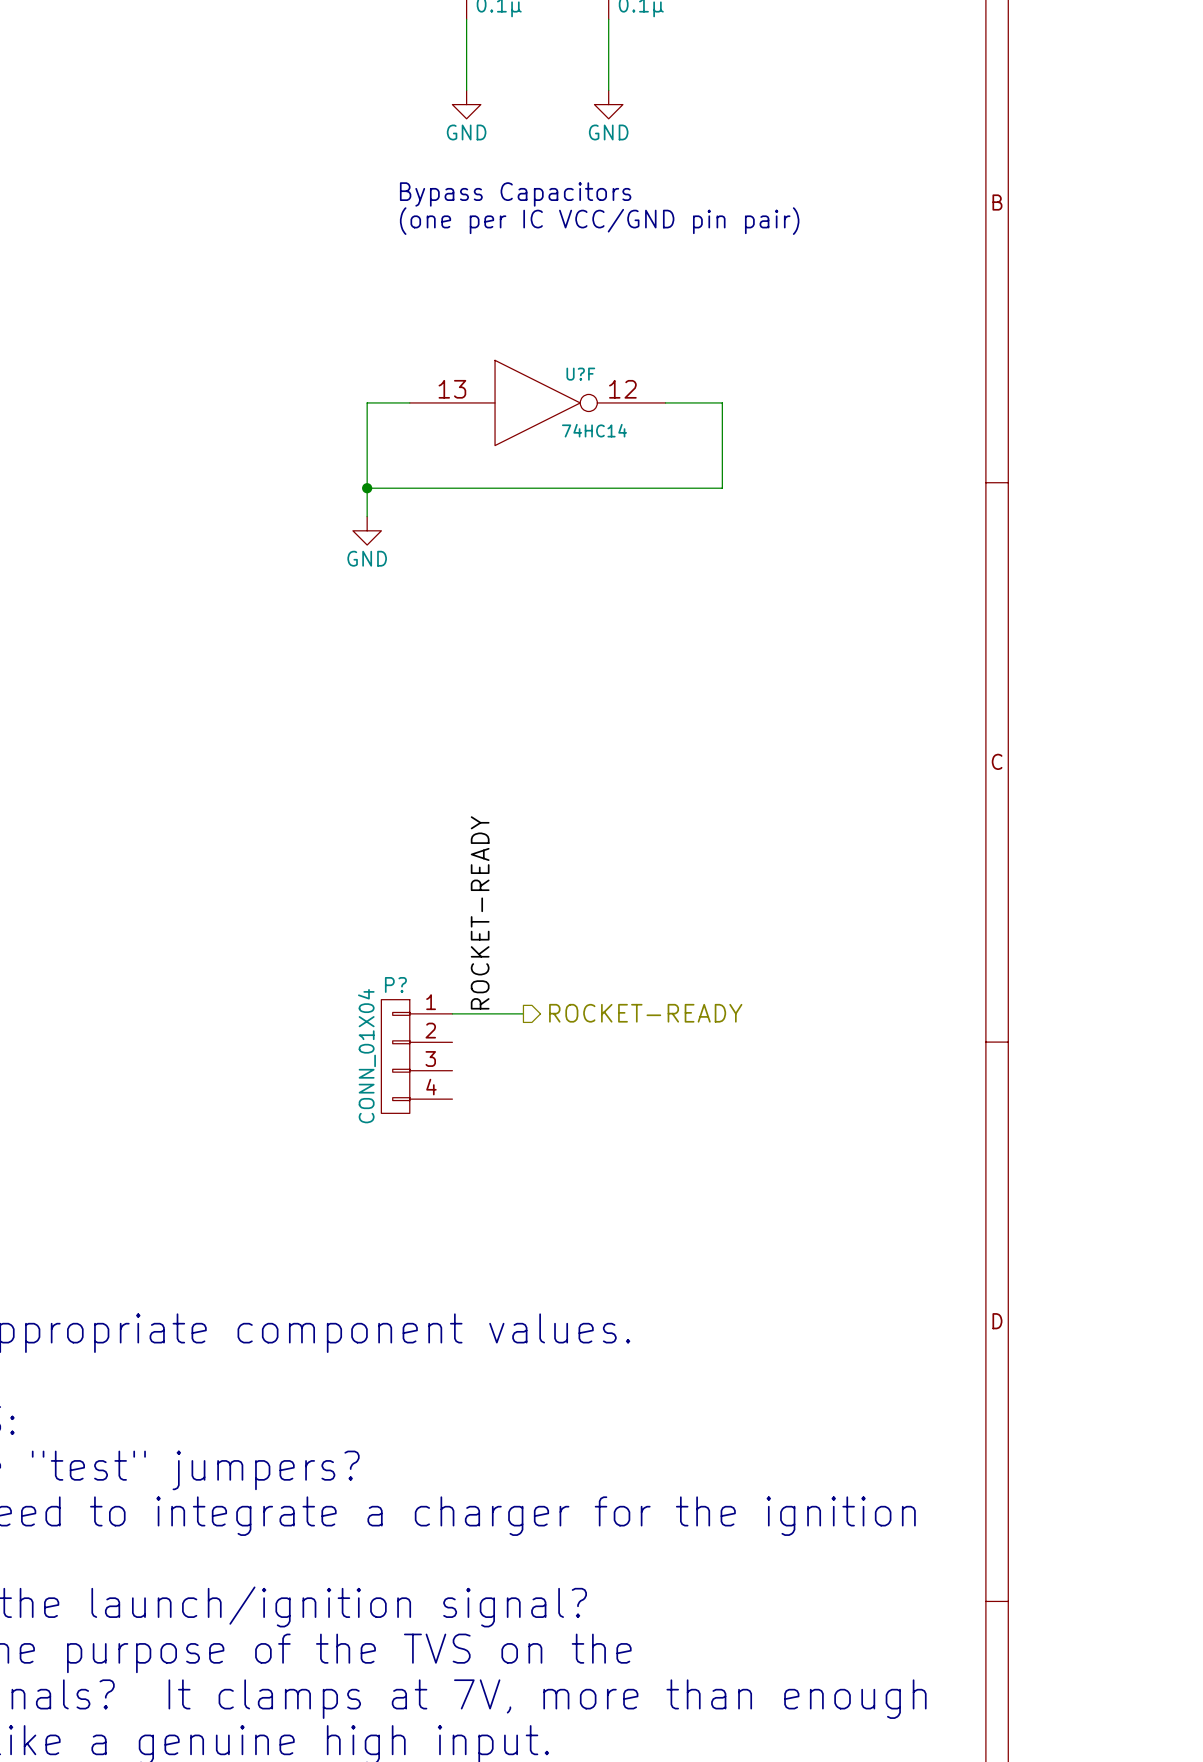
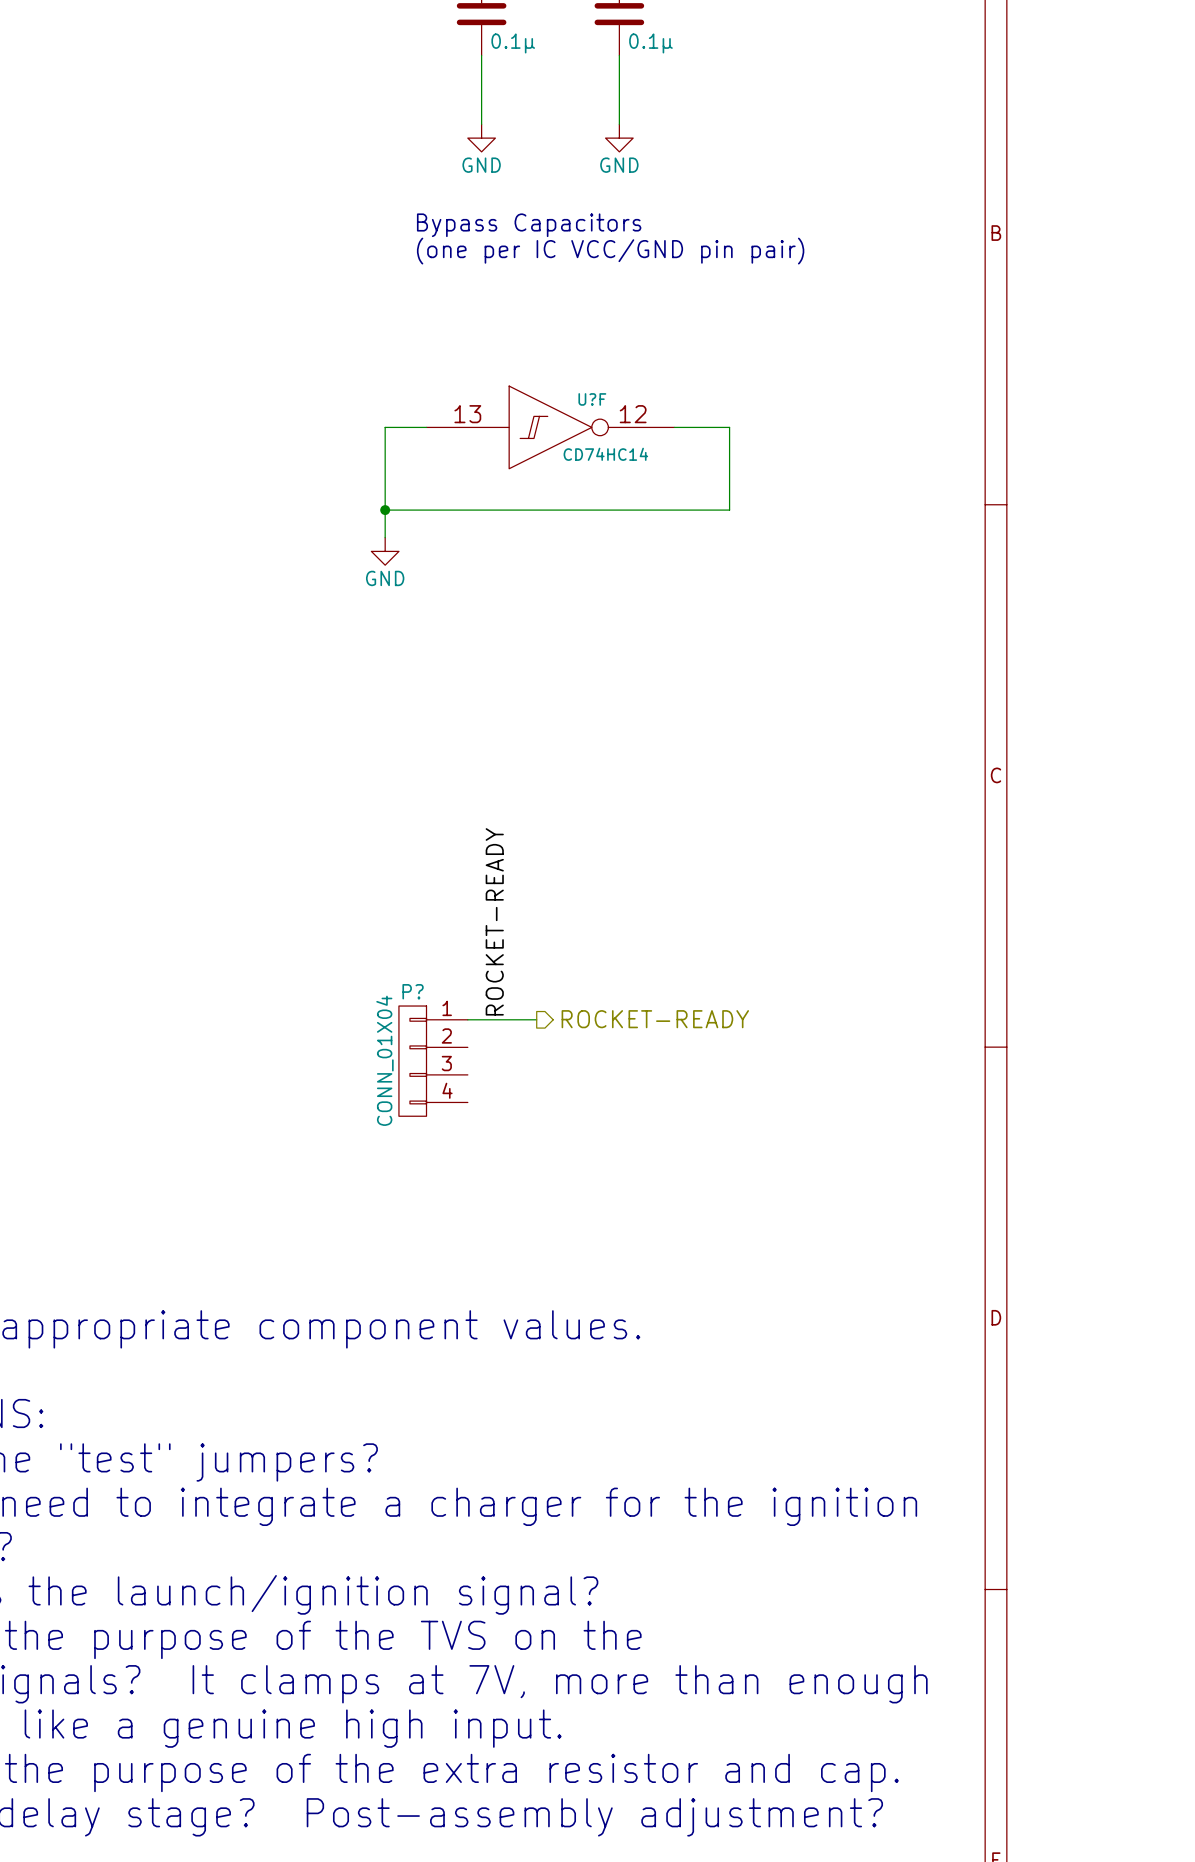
U?F symbol: [409, 360, 666, 446] -> [426, 386, 675, 469]
U?F value: 74HC14 (594, 430) -> CD74HC14 (605, 454)

